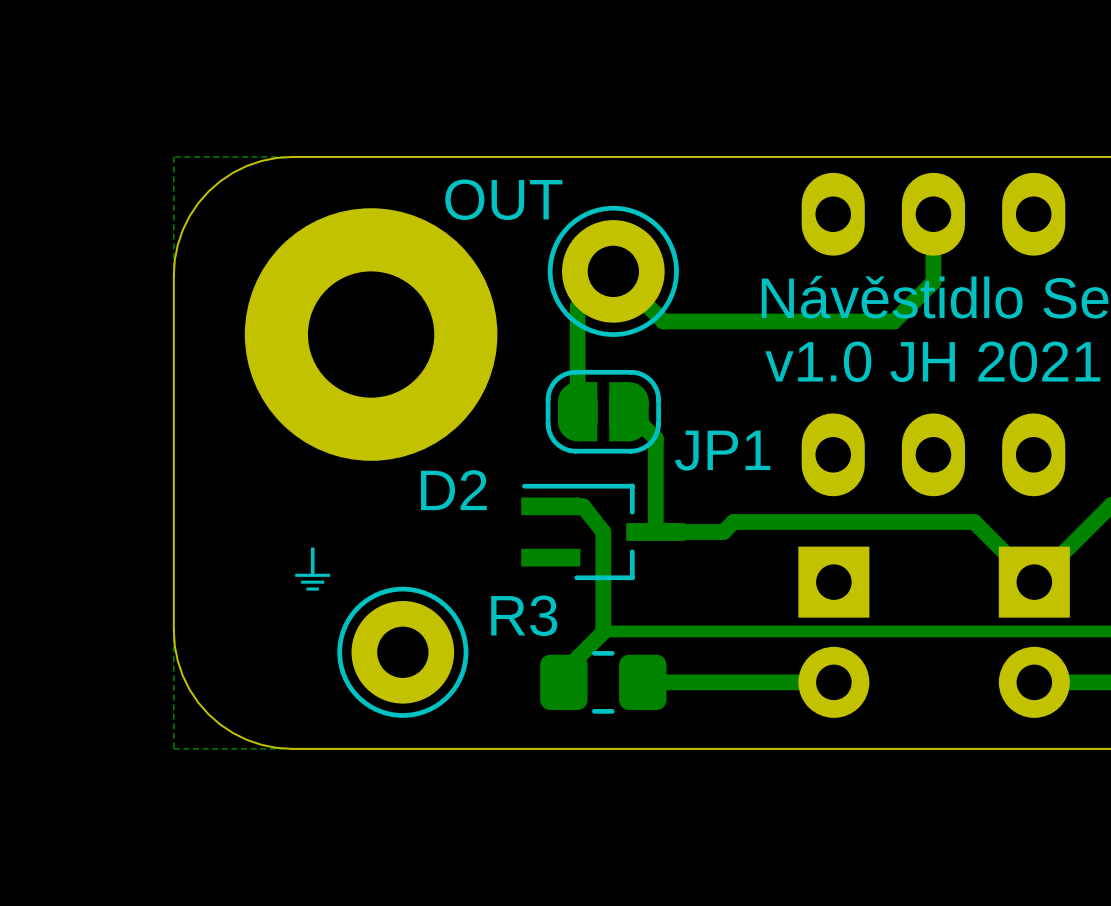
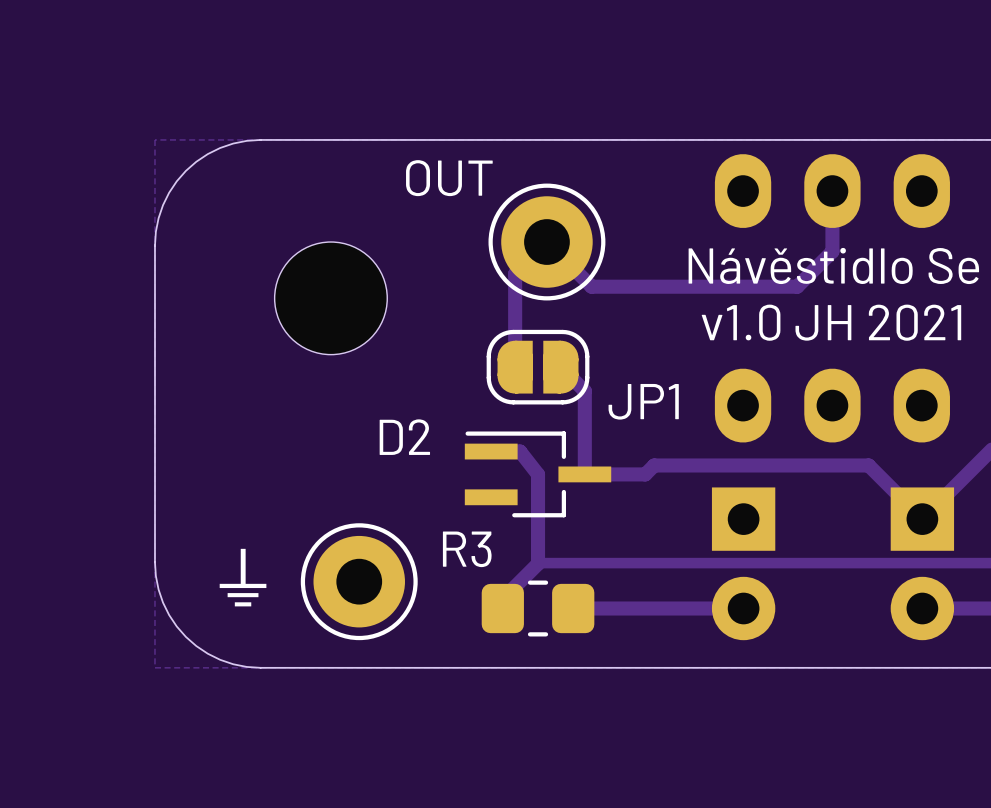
part footprint: [244, 208, 498, 461] -> [274, 242, 388, 355]
part name: ⏚ (312, 569) -> none
text: none -> ⏚ (243, 577)

